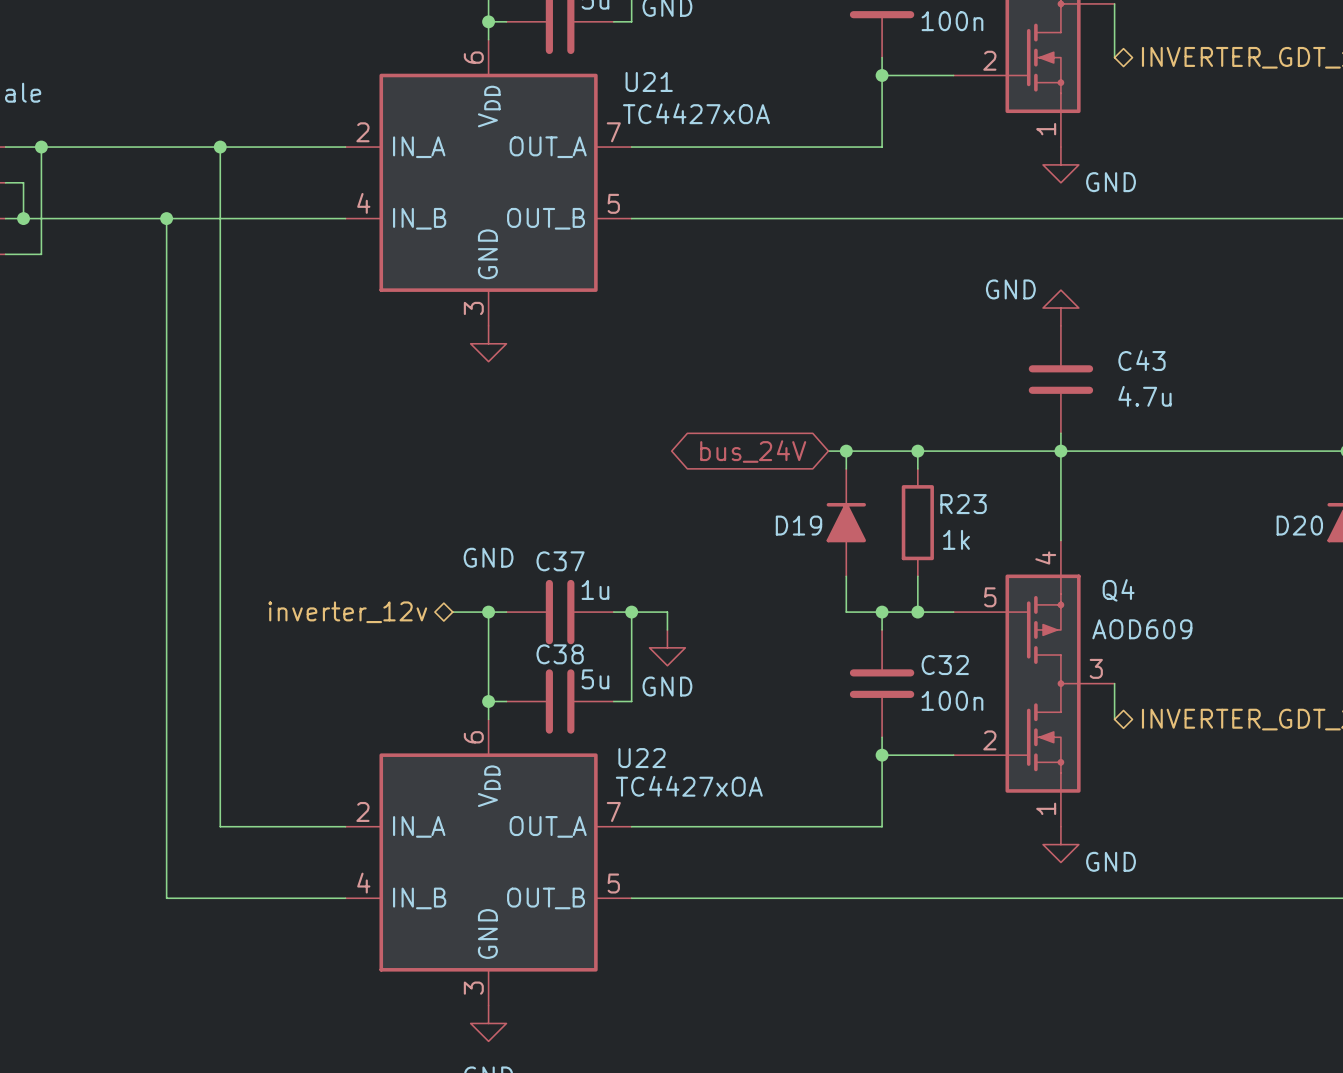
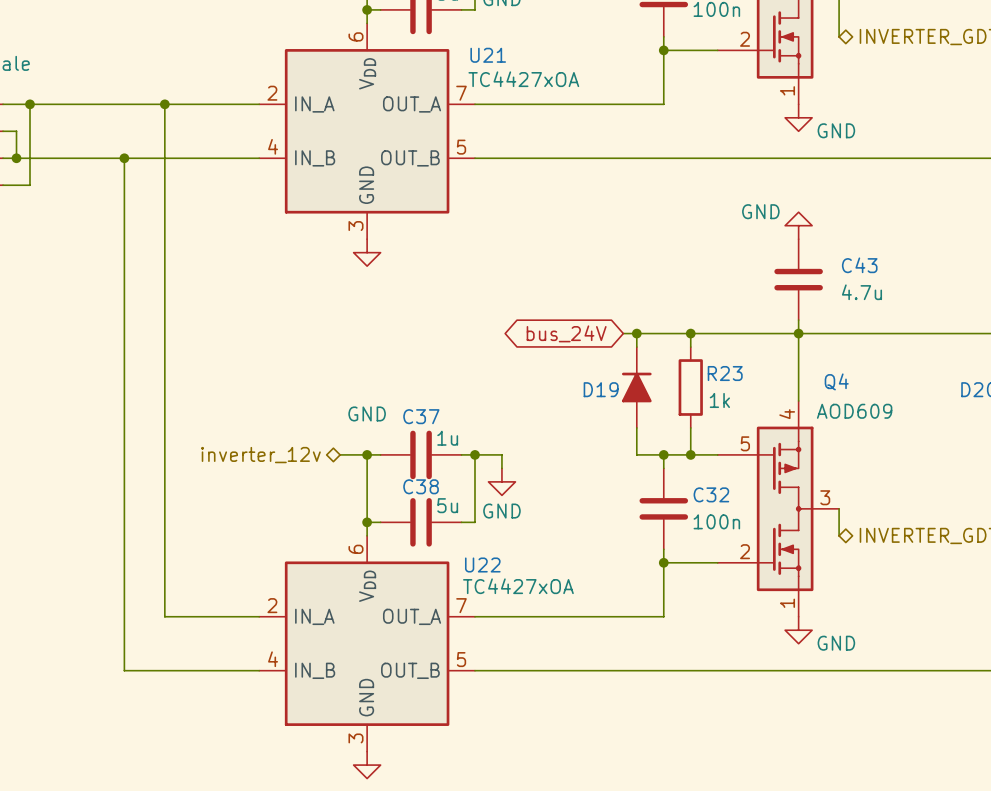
Q4 name position: Q4 (1118, 590) -> Q4 (836, 381)
Q4 value position: AOD609 (1142, 629) -> AOD609 (854, 411)

